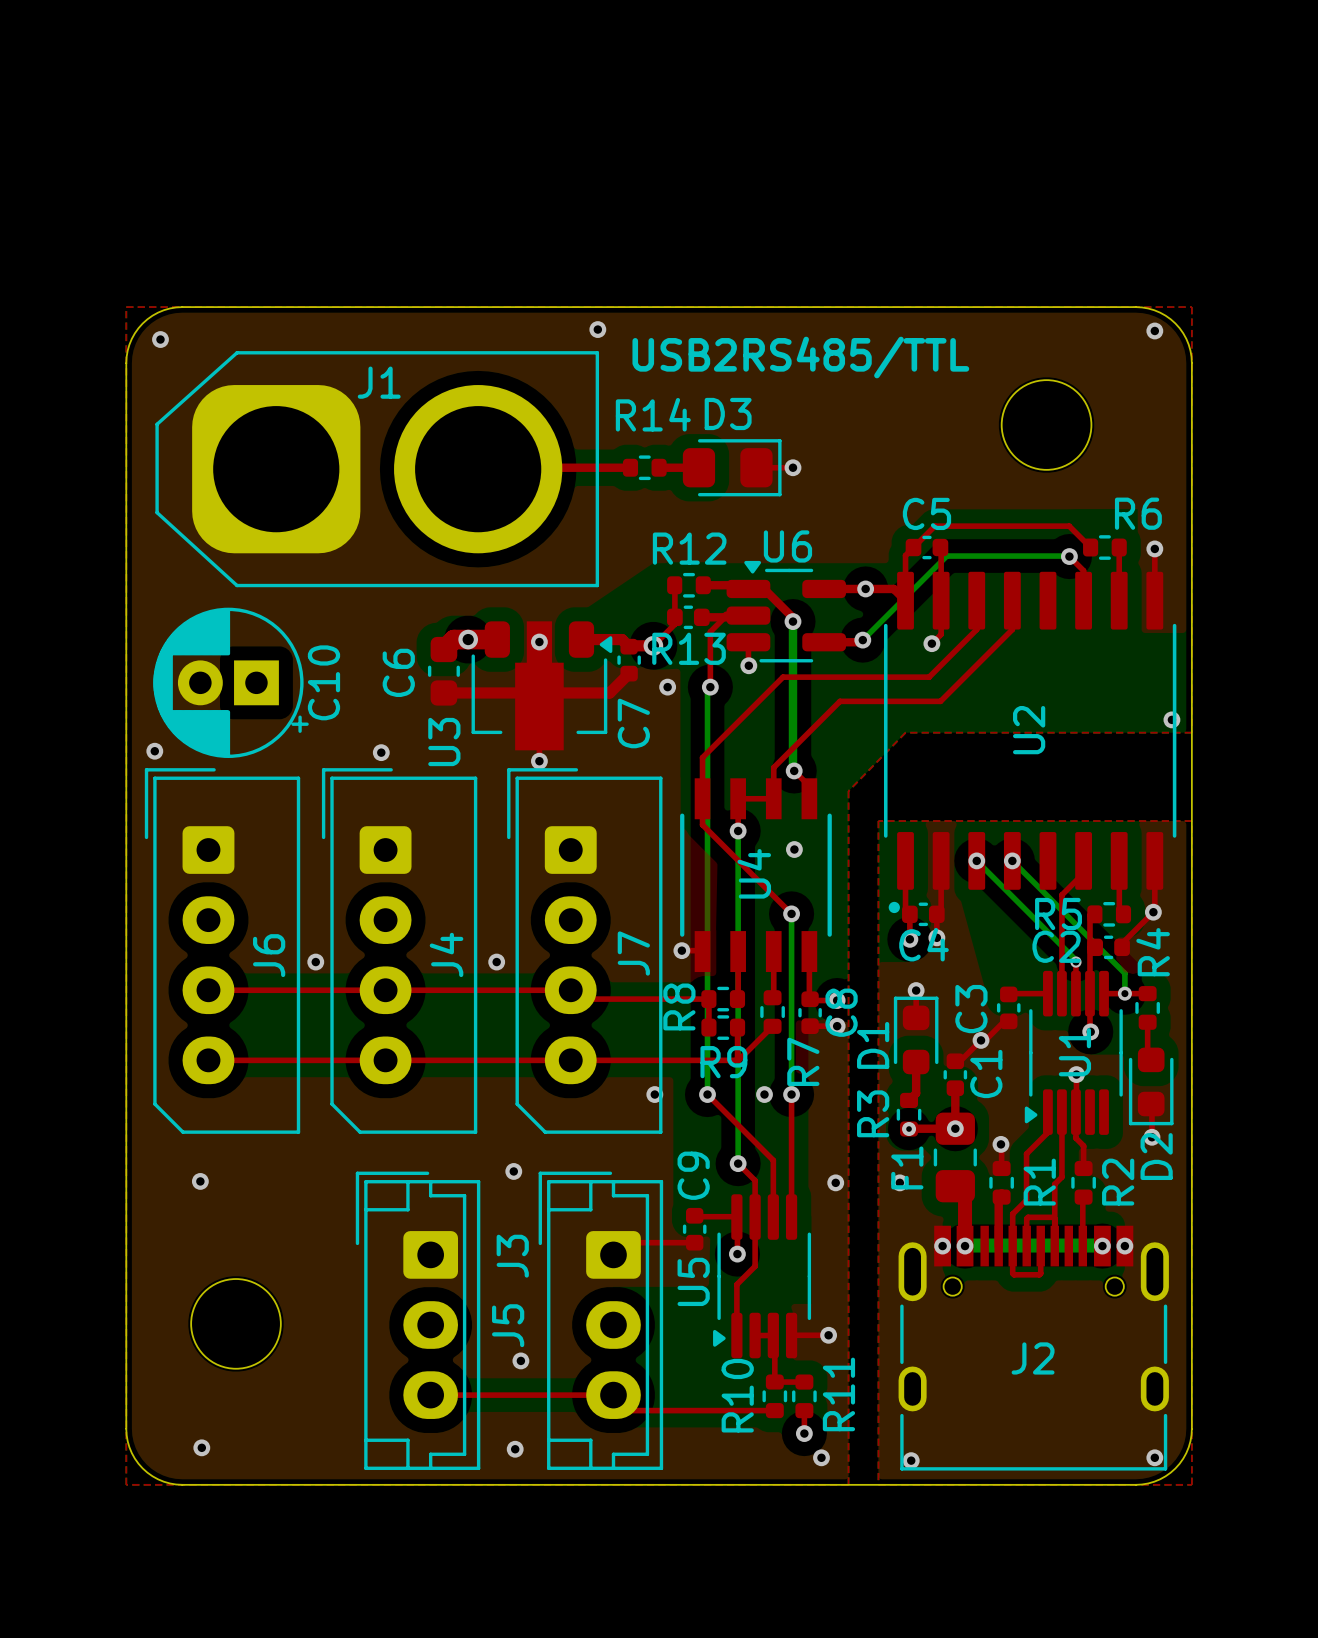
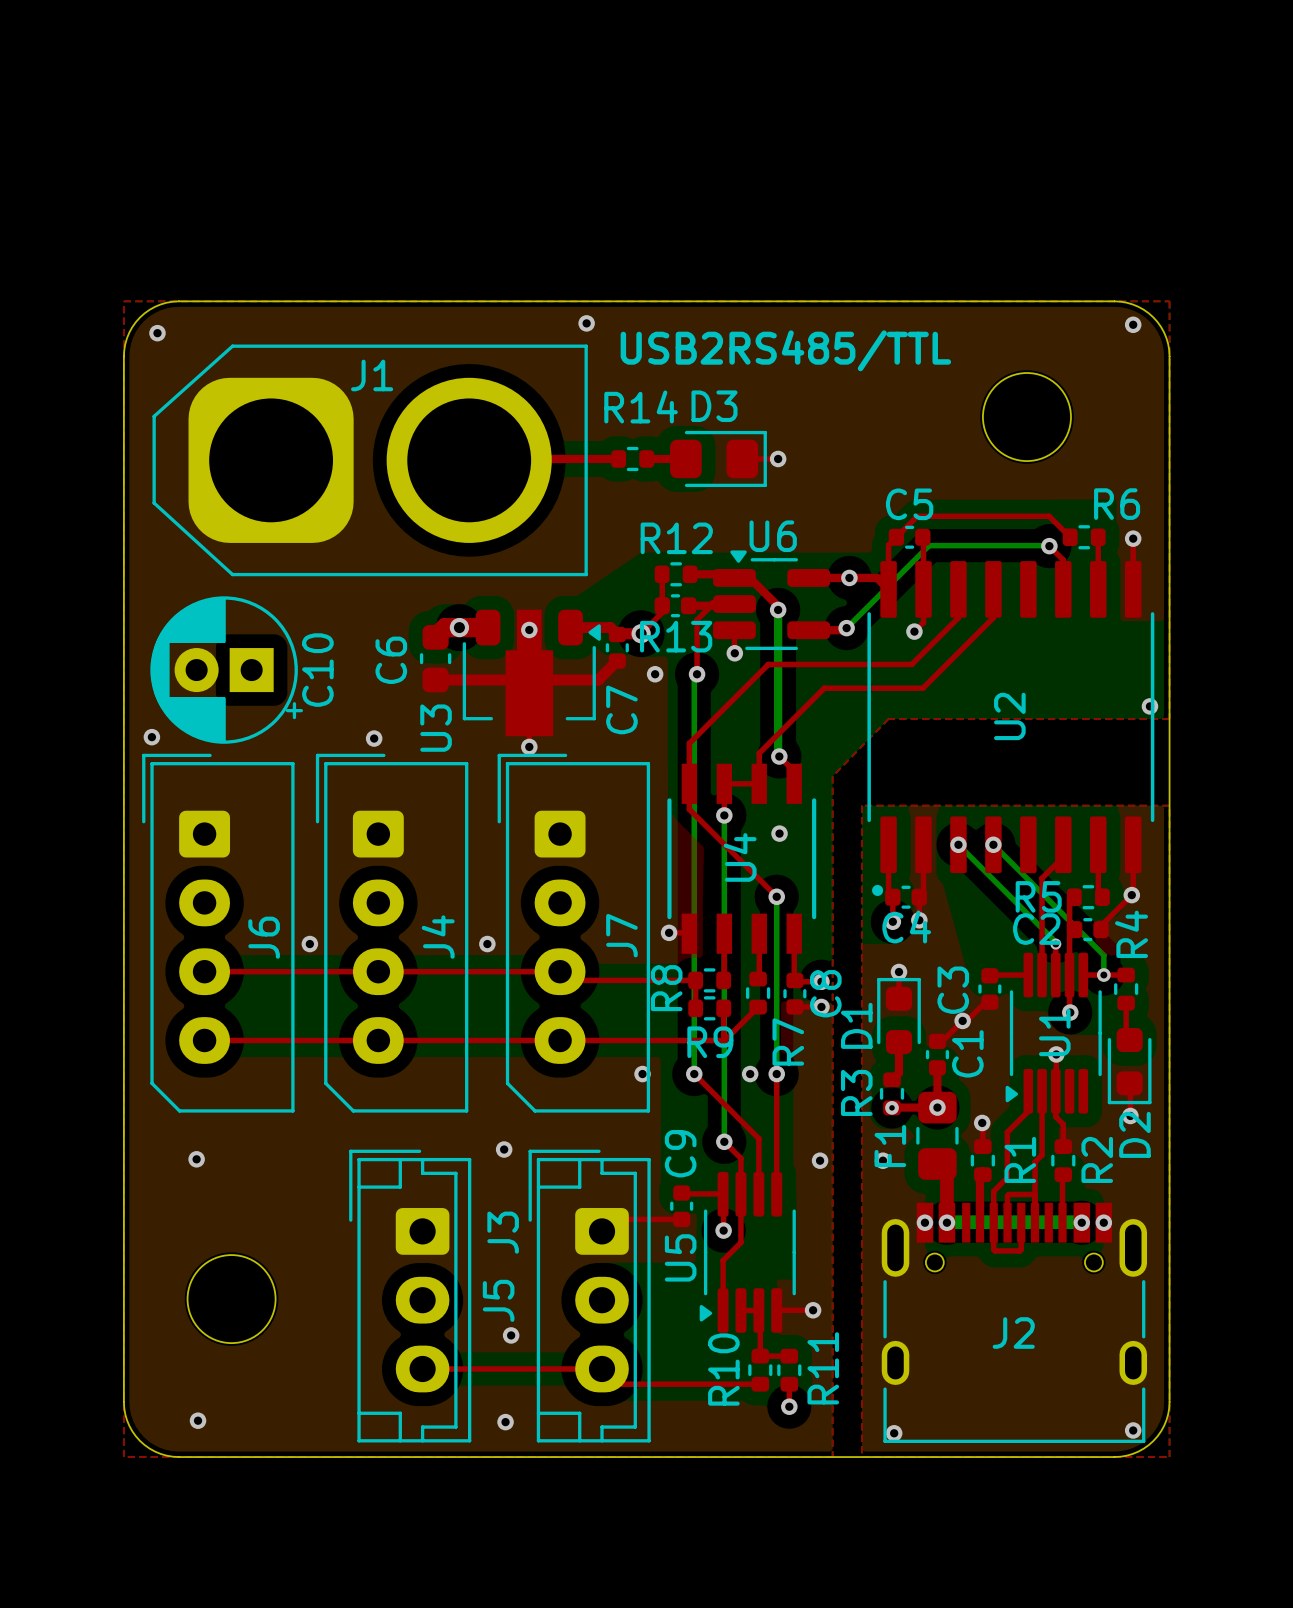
via: (821, 1457) -> none

